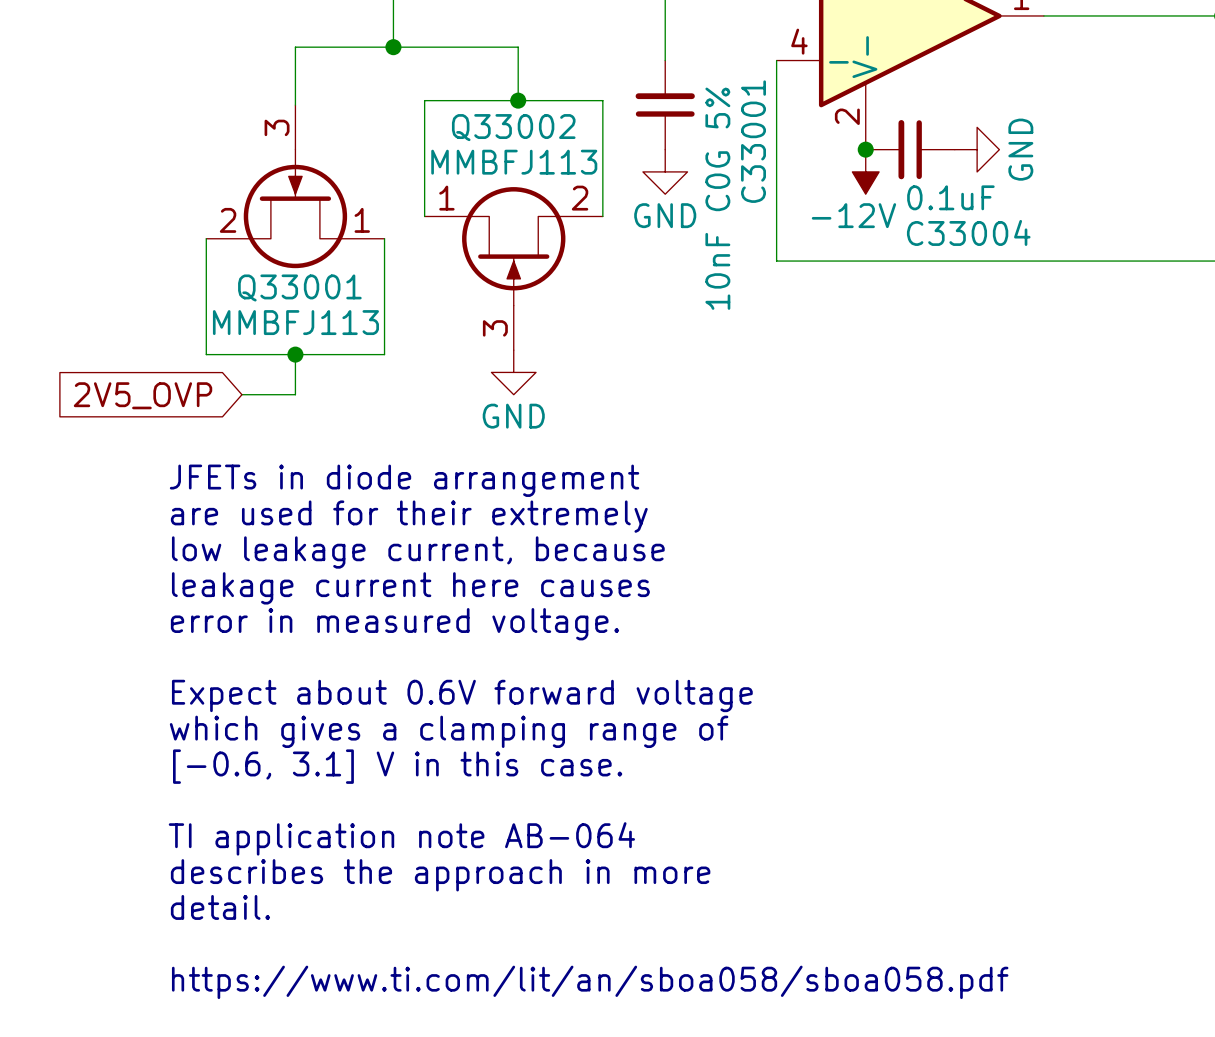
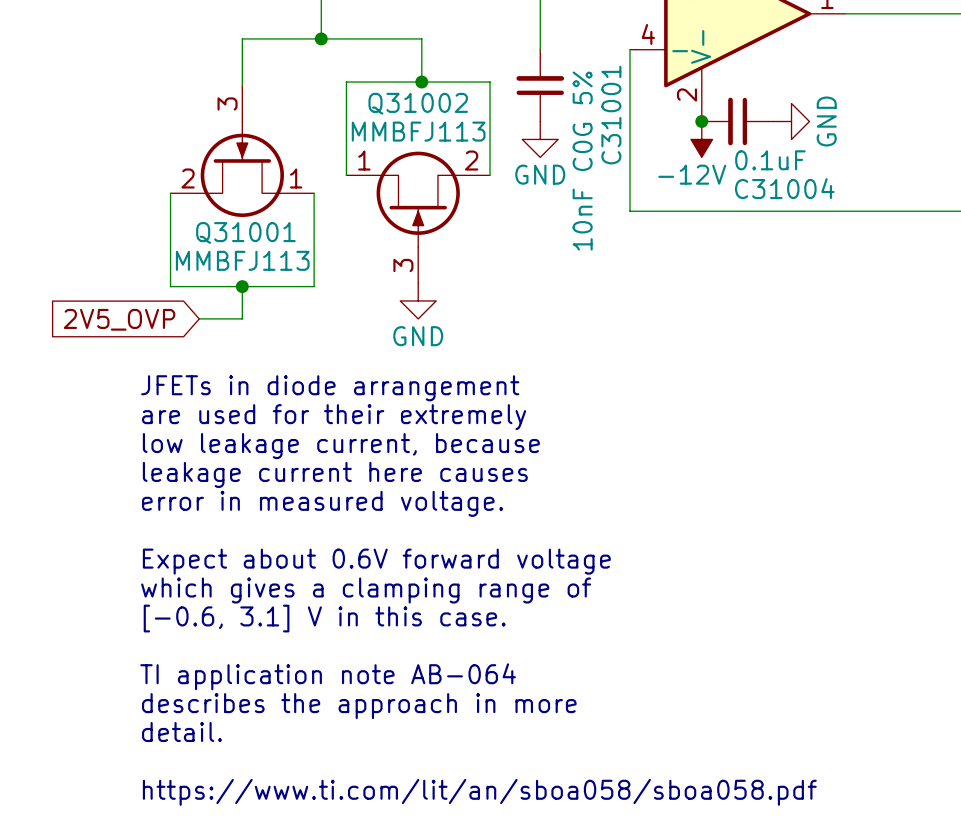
Q33002 name: Q33002 (513, 127) -> Q31002 (418, 103)
C33001 name: C33001 (753, 141) -> C31001 (611, 115)
C33004 name: C33004 (968, 232) -> C31004 (784, 188)
Q33001 name: Q33001 (299, 288) -> Q31001 (245, 232)

